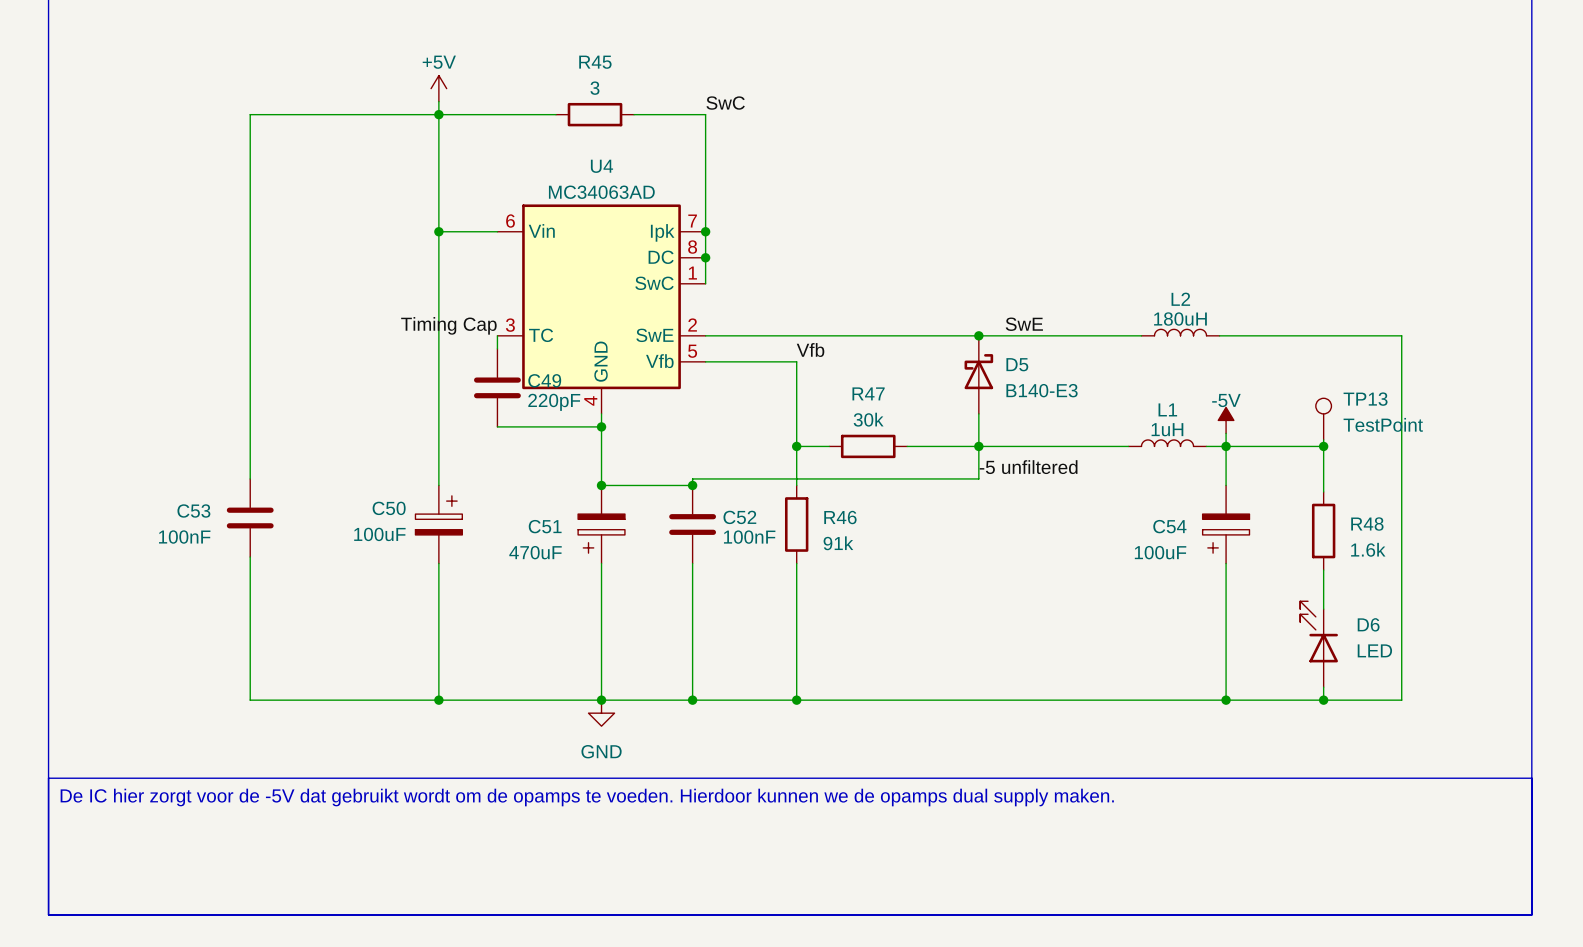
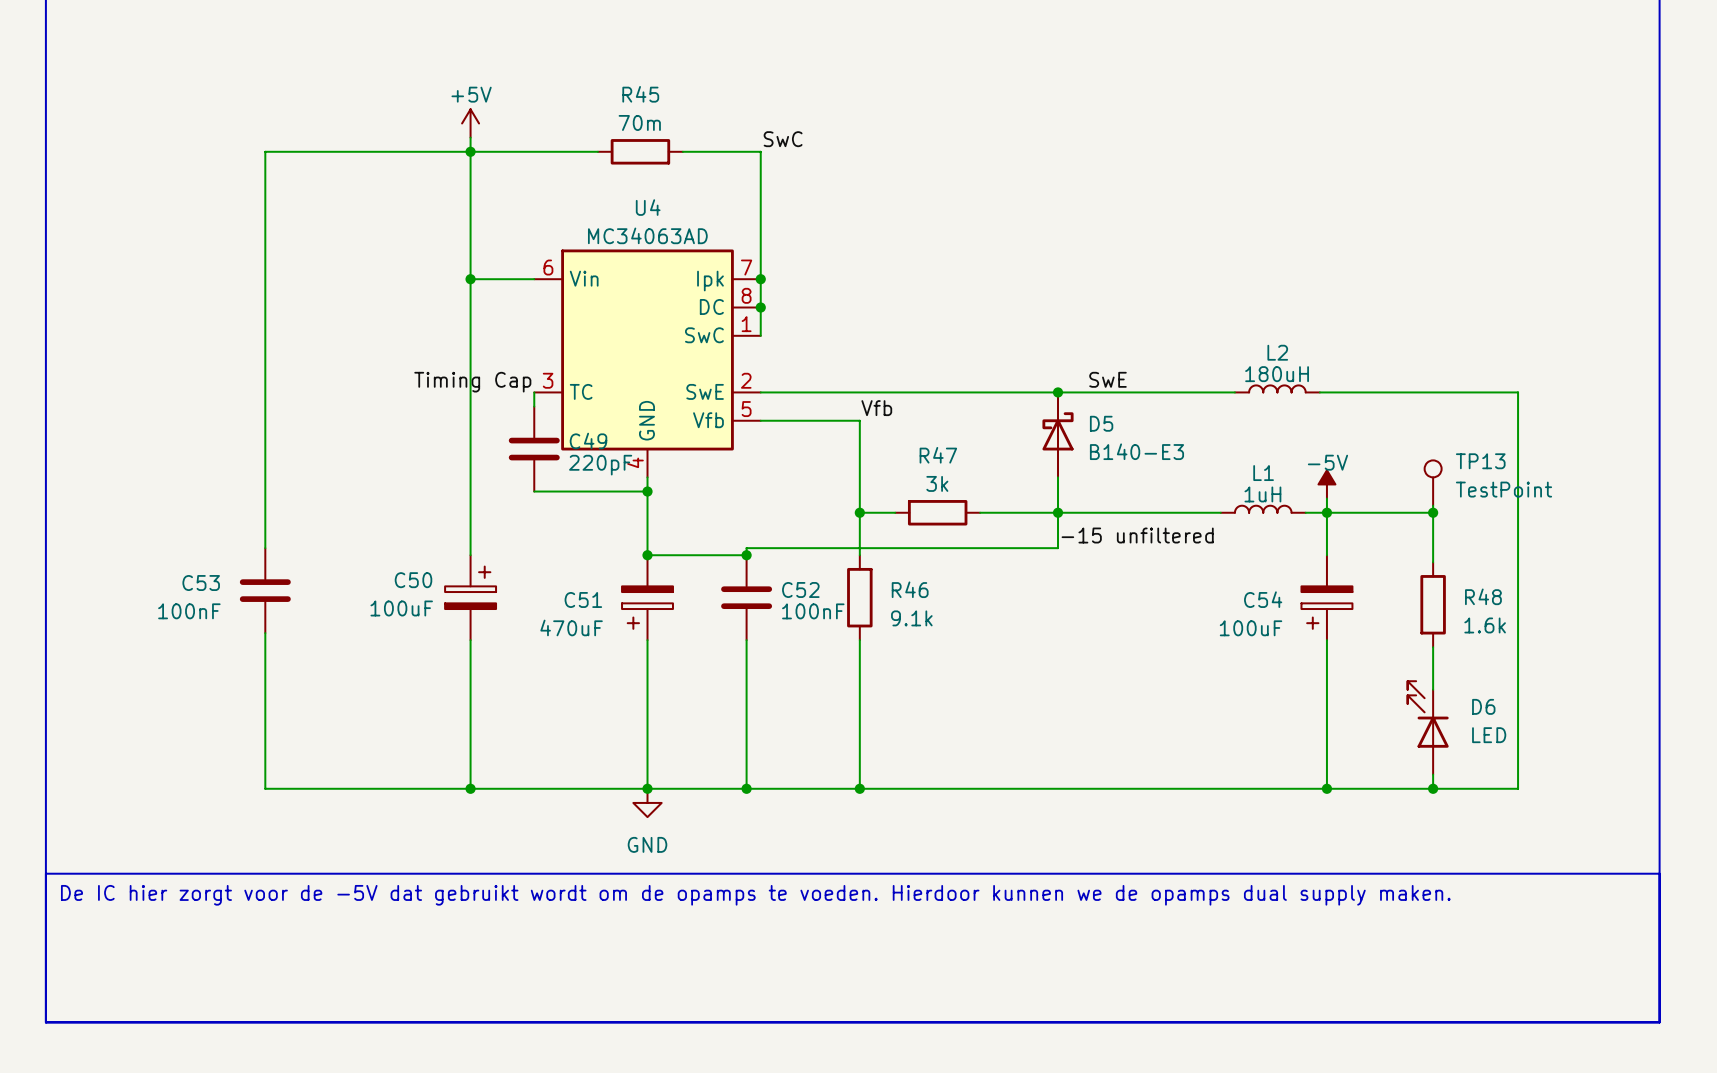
R45 value: 3 (594, 88) -> 70m (639, 122)
R47 value: 30k (868, 419) -> 3k (937, 483)
label: -5 unfiltered (1028, 467) -> -15 unfiltered (1137, 535)
R46 value: 91k (838, 543) -> 9.1k (911, 618)

